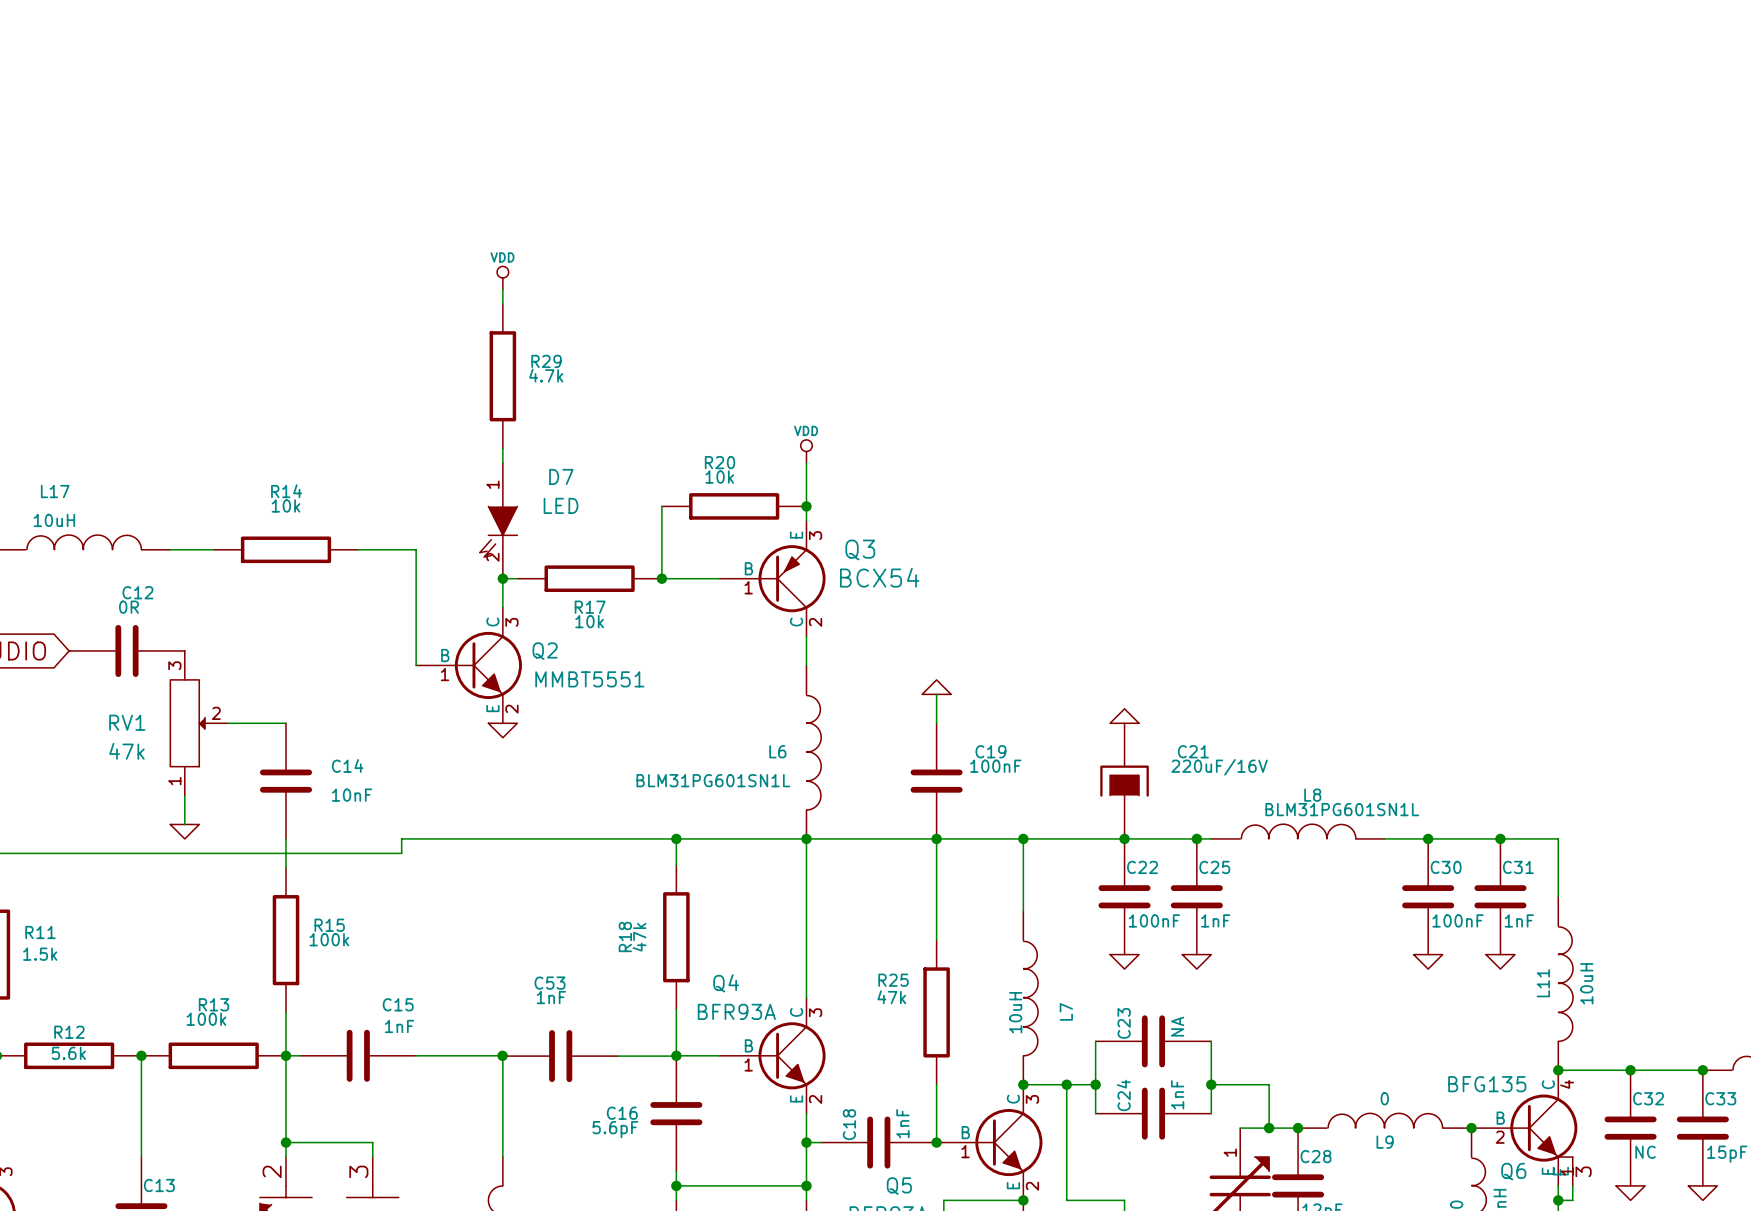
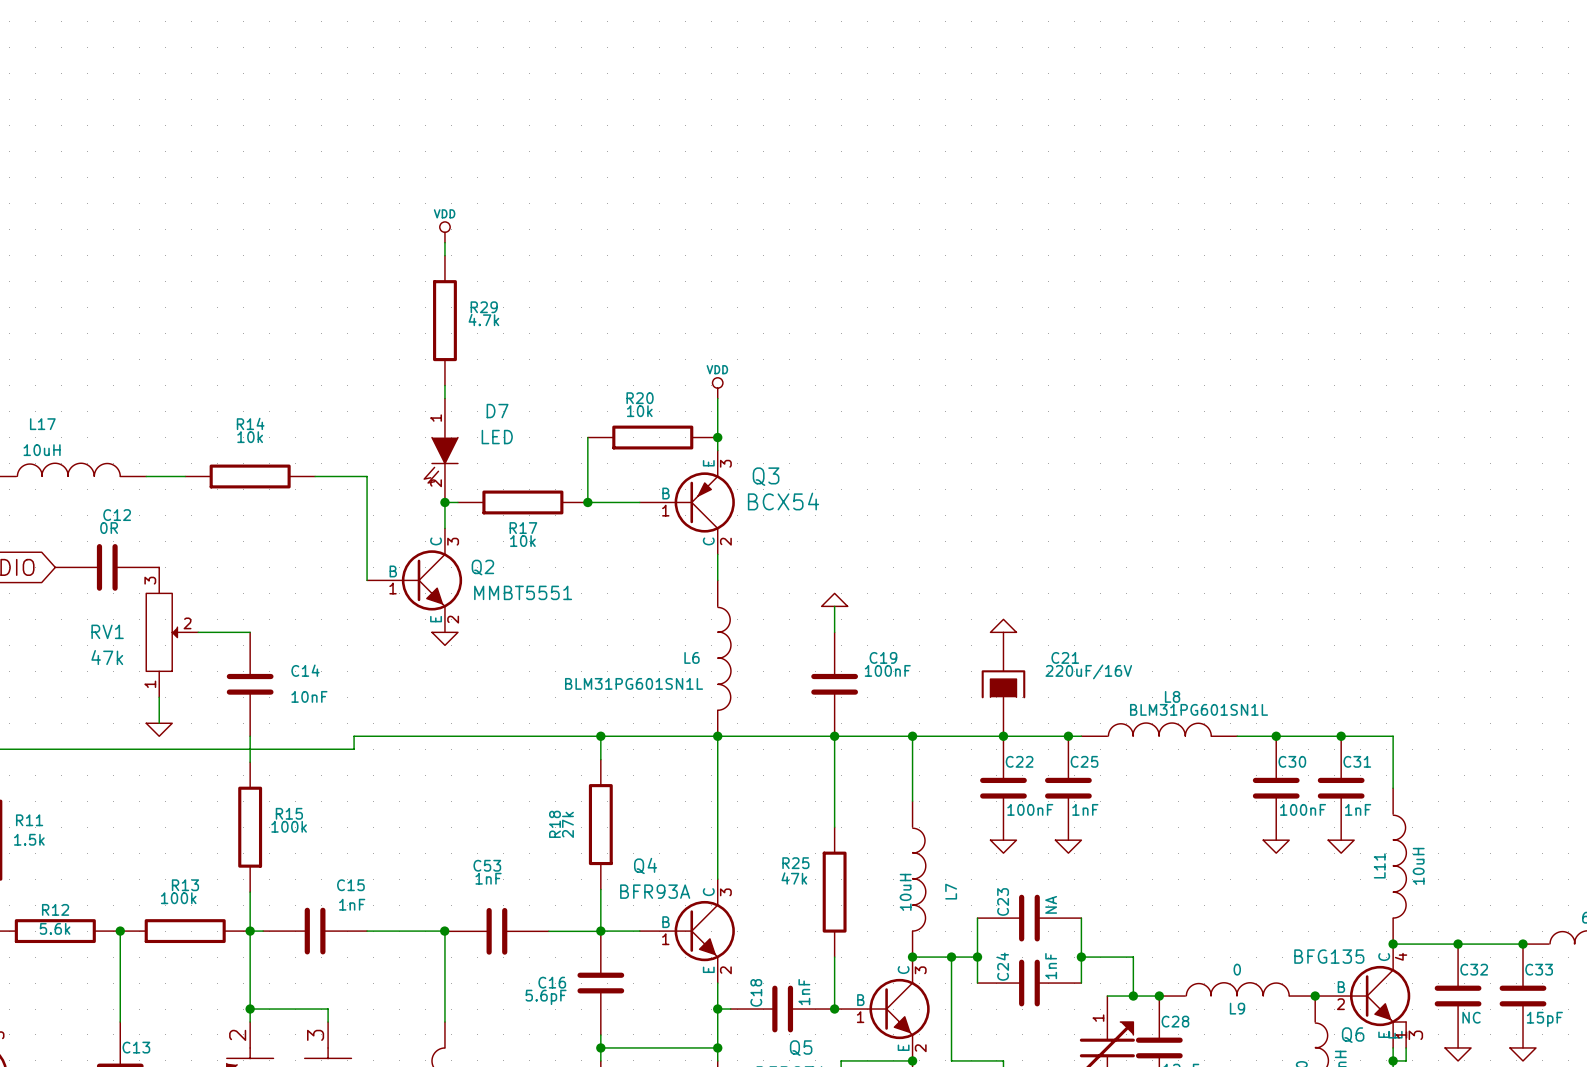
R18 value: 47k (639, 937) -> 27k (567, 824)

